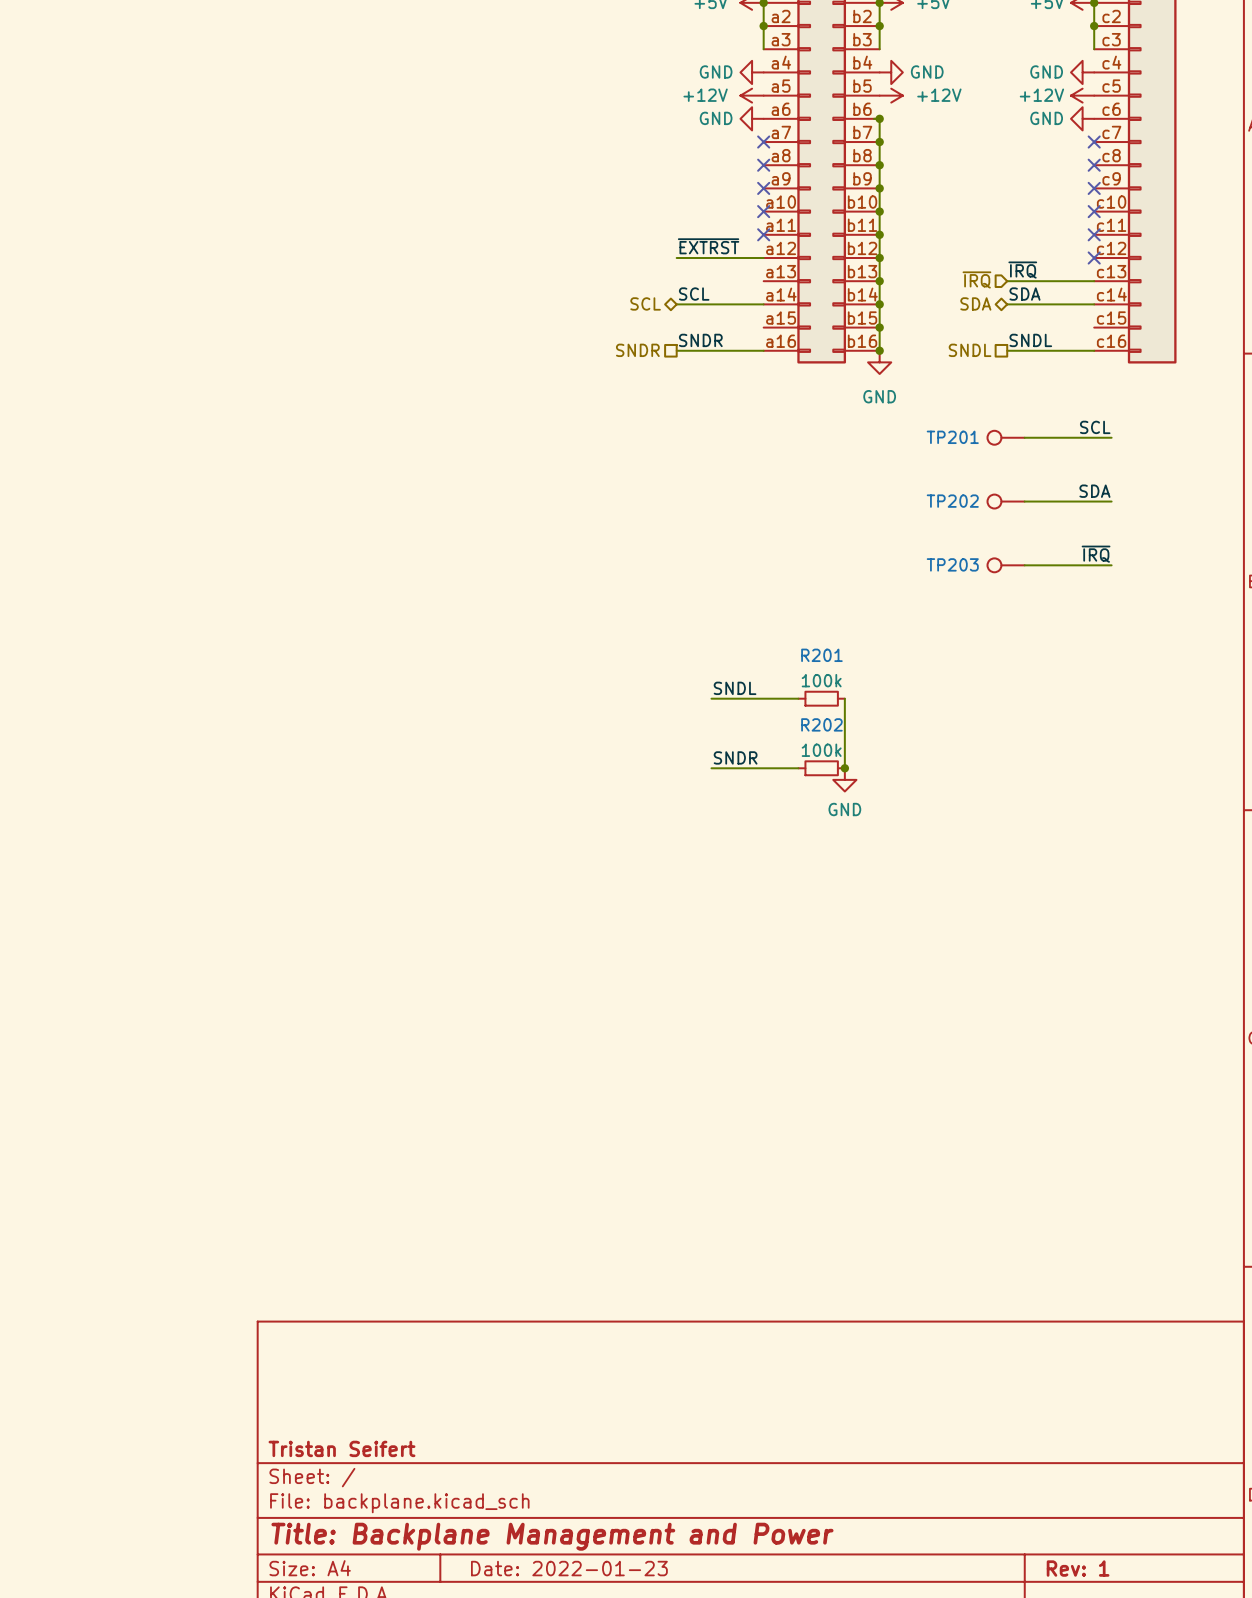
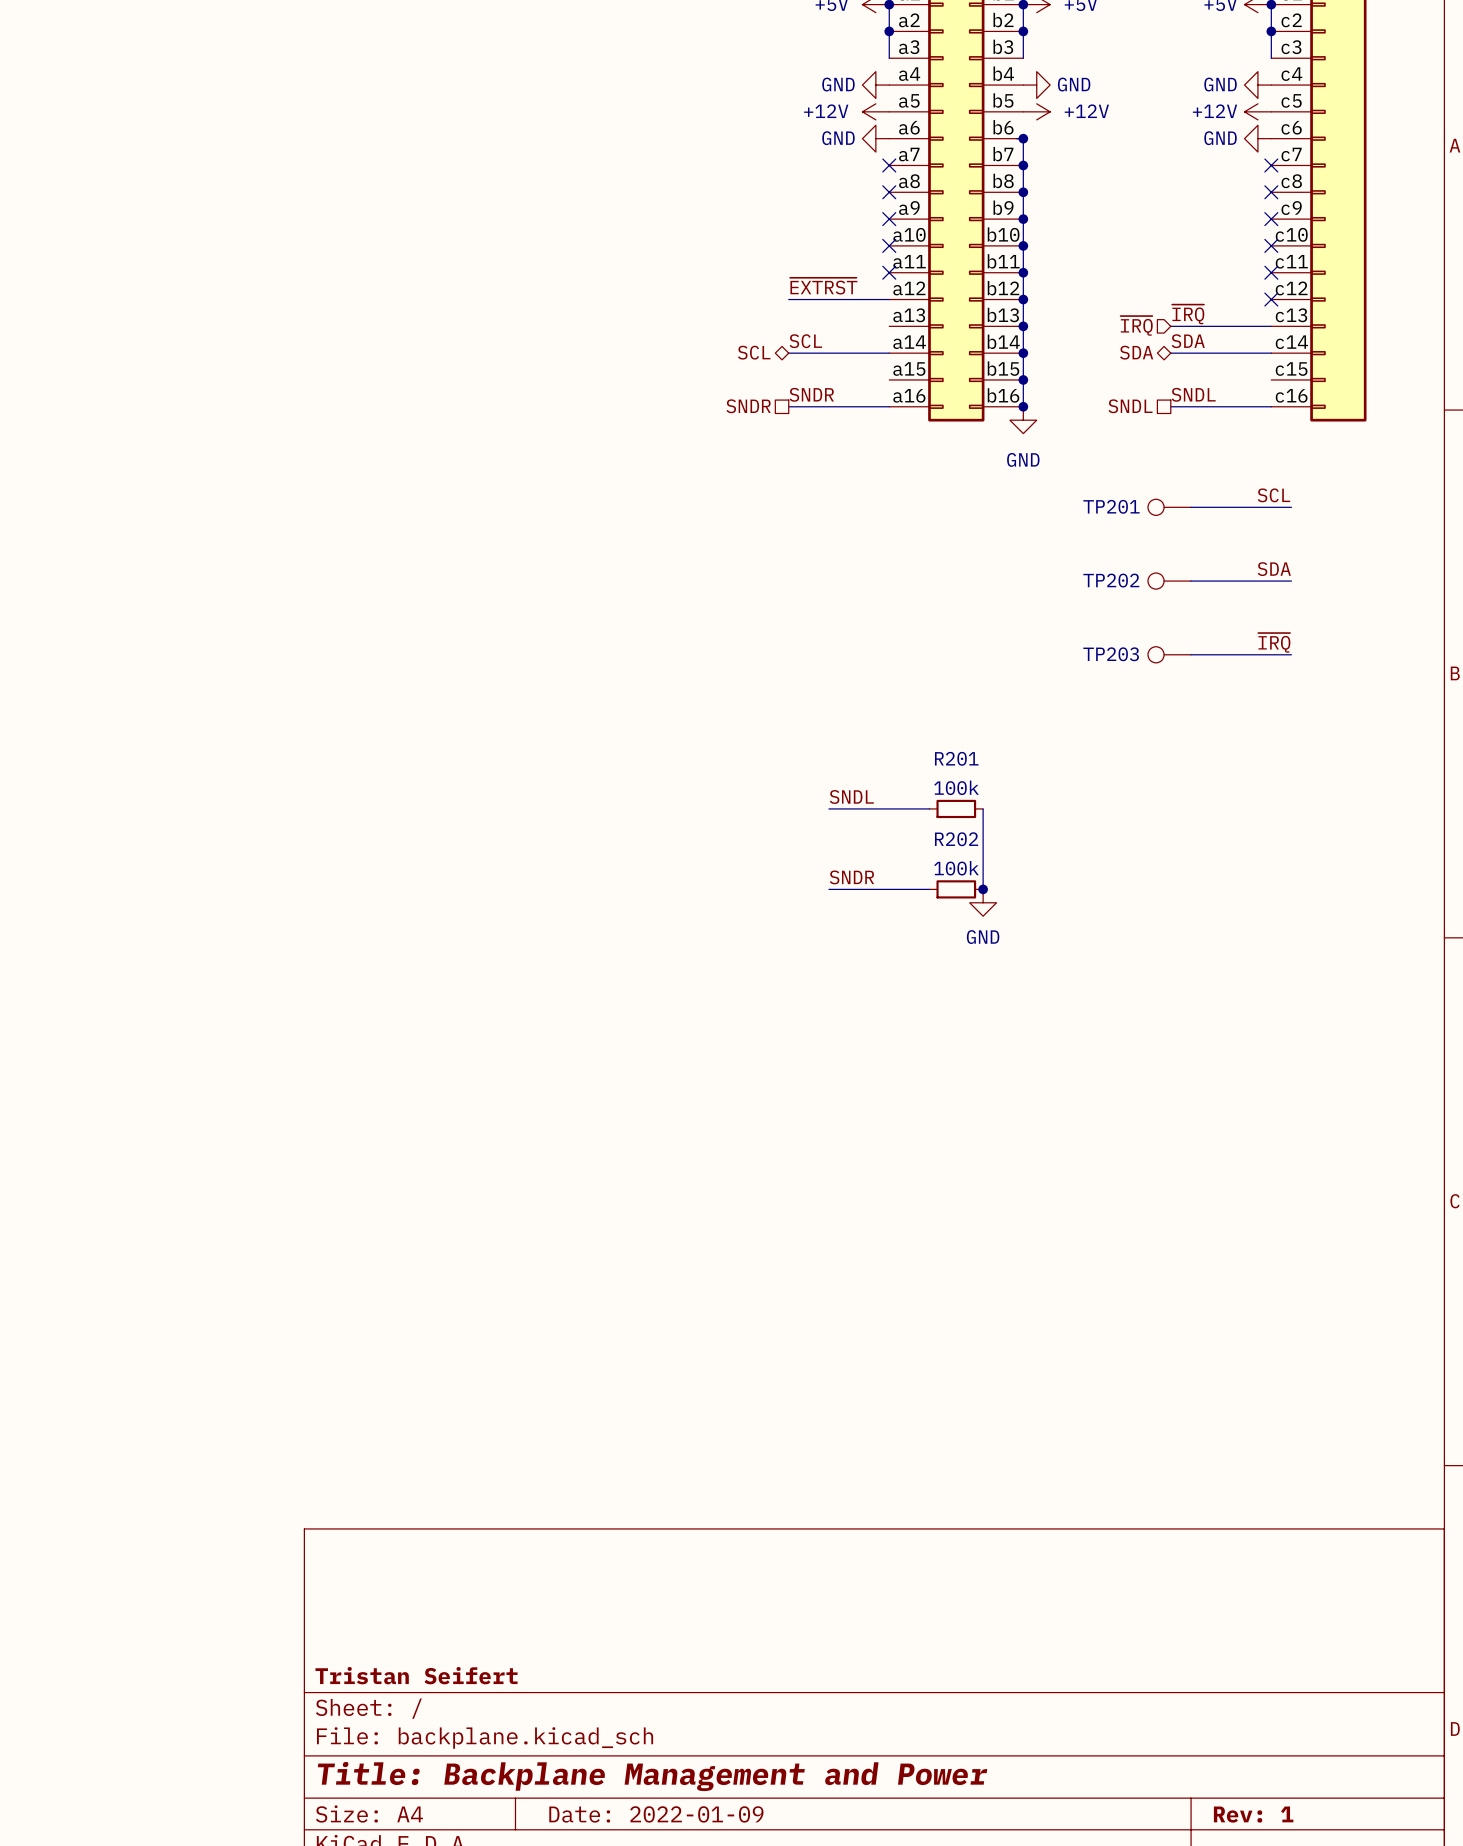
title block: Date: 2022-01-23 (569, 1568) -> Date: 2022-01-09 (656, 1814)

